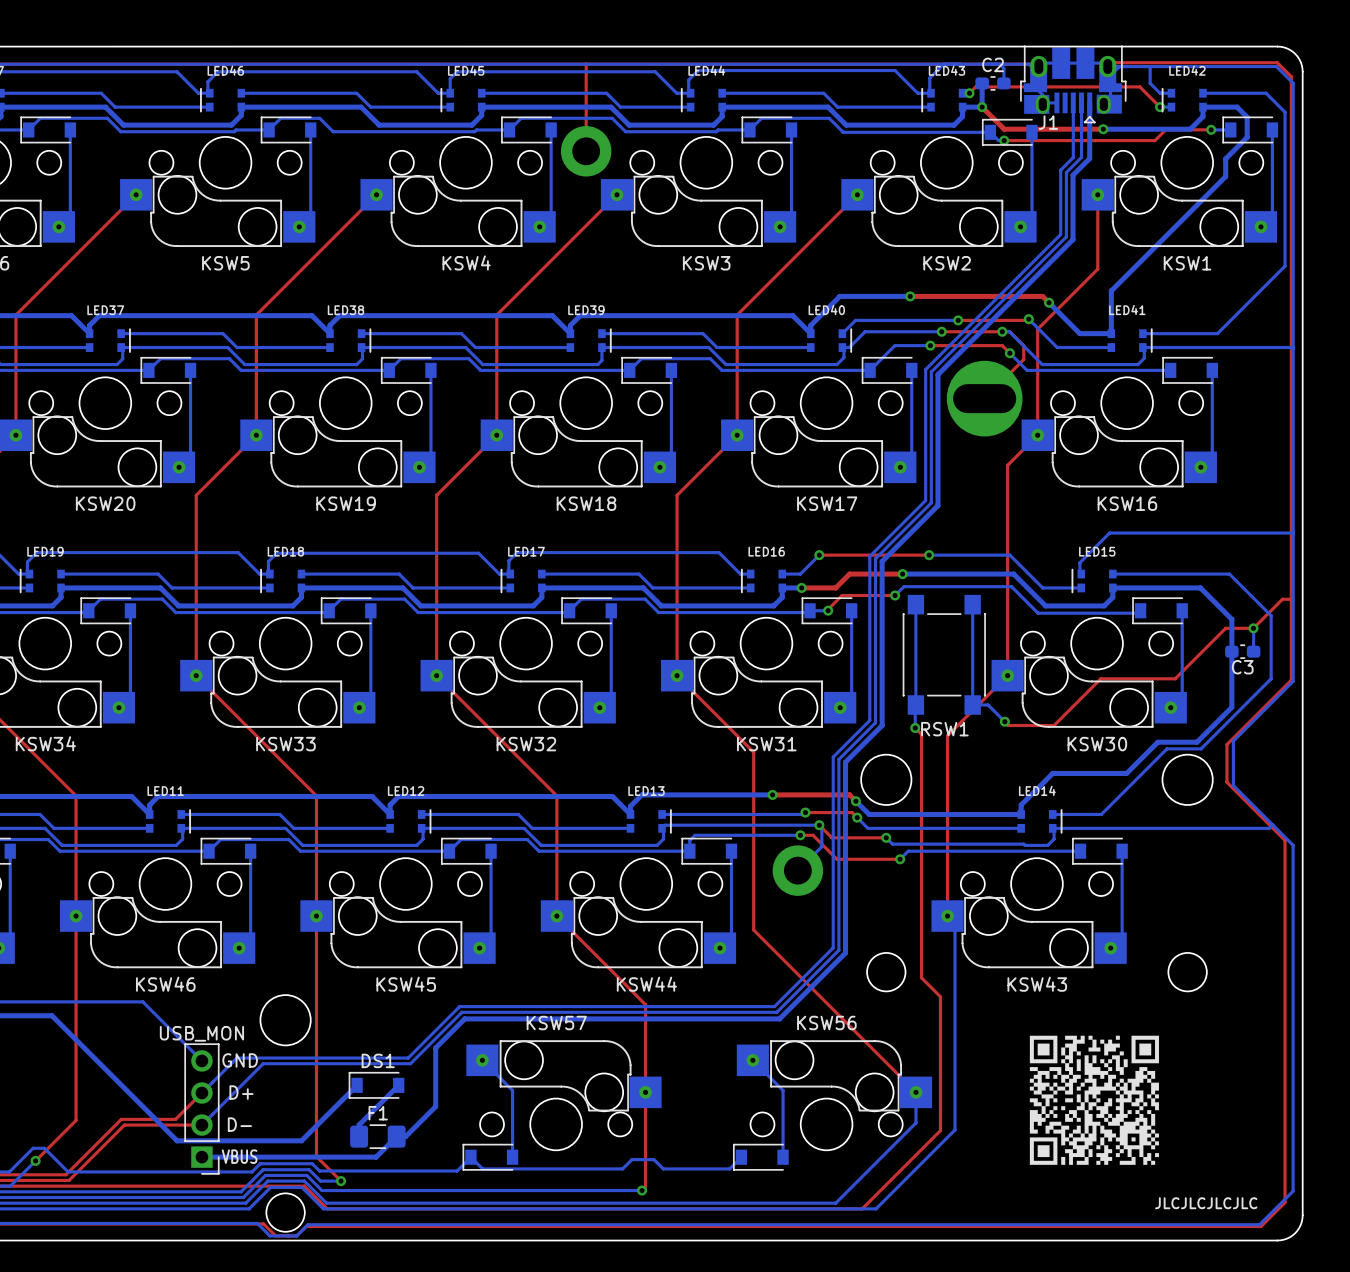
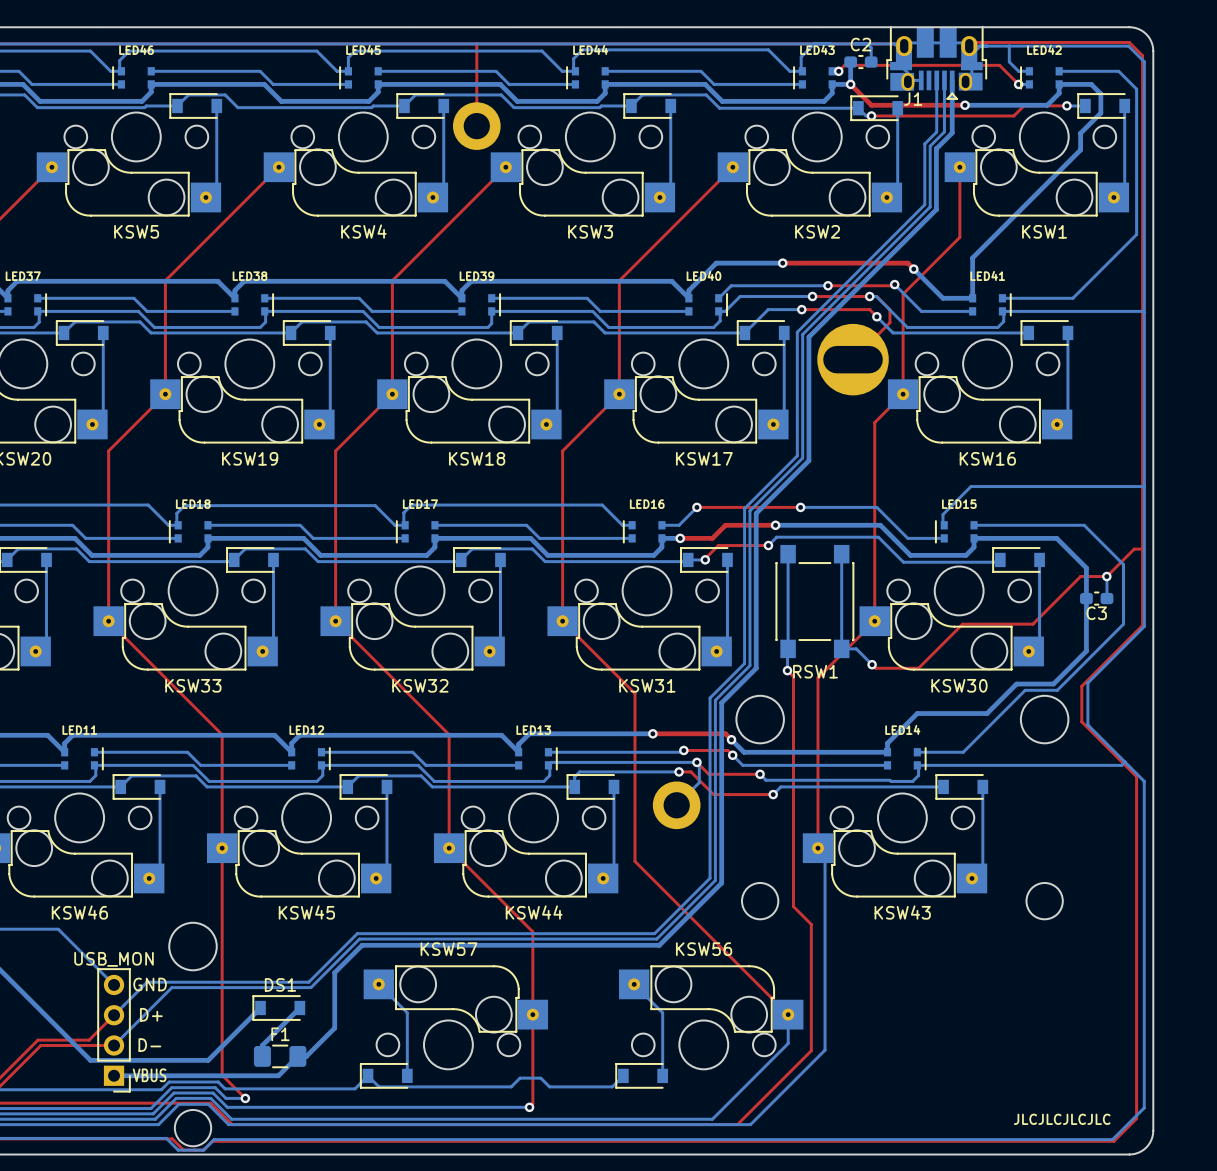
drawing: [1029, 1035, 1160, 1165] -> none

